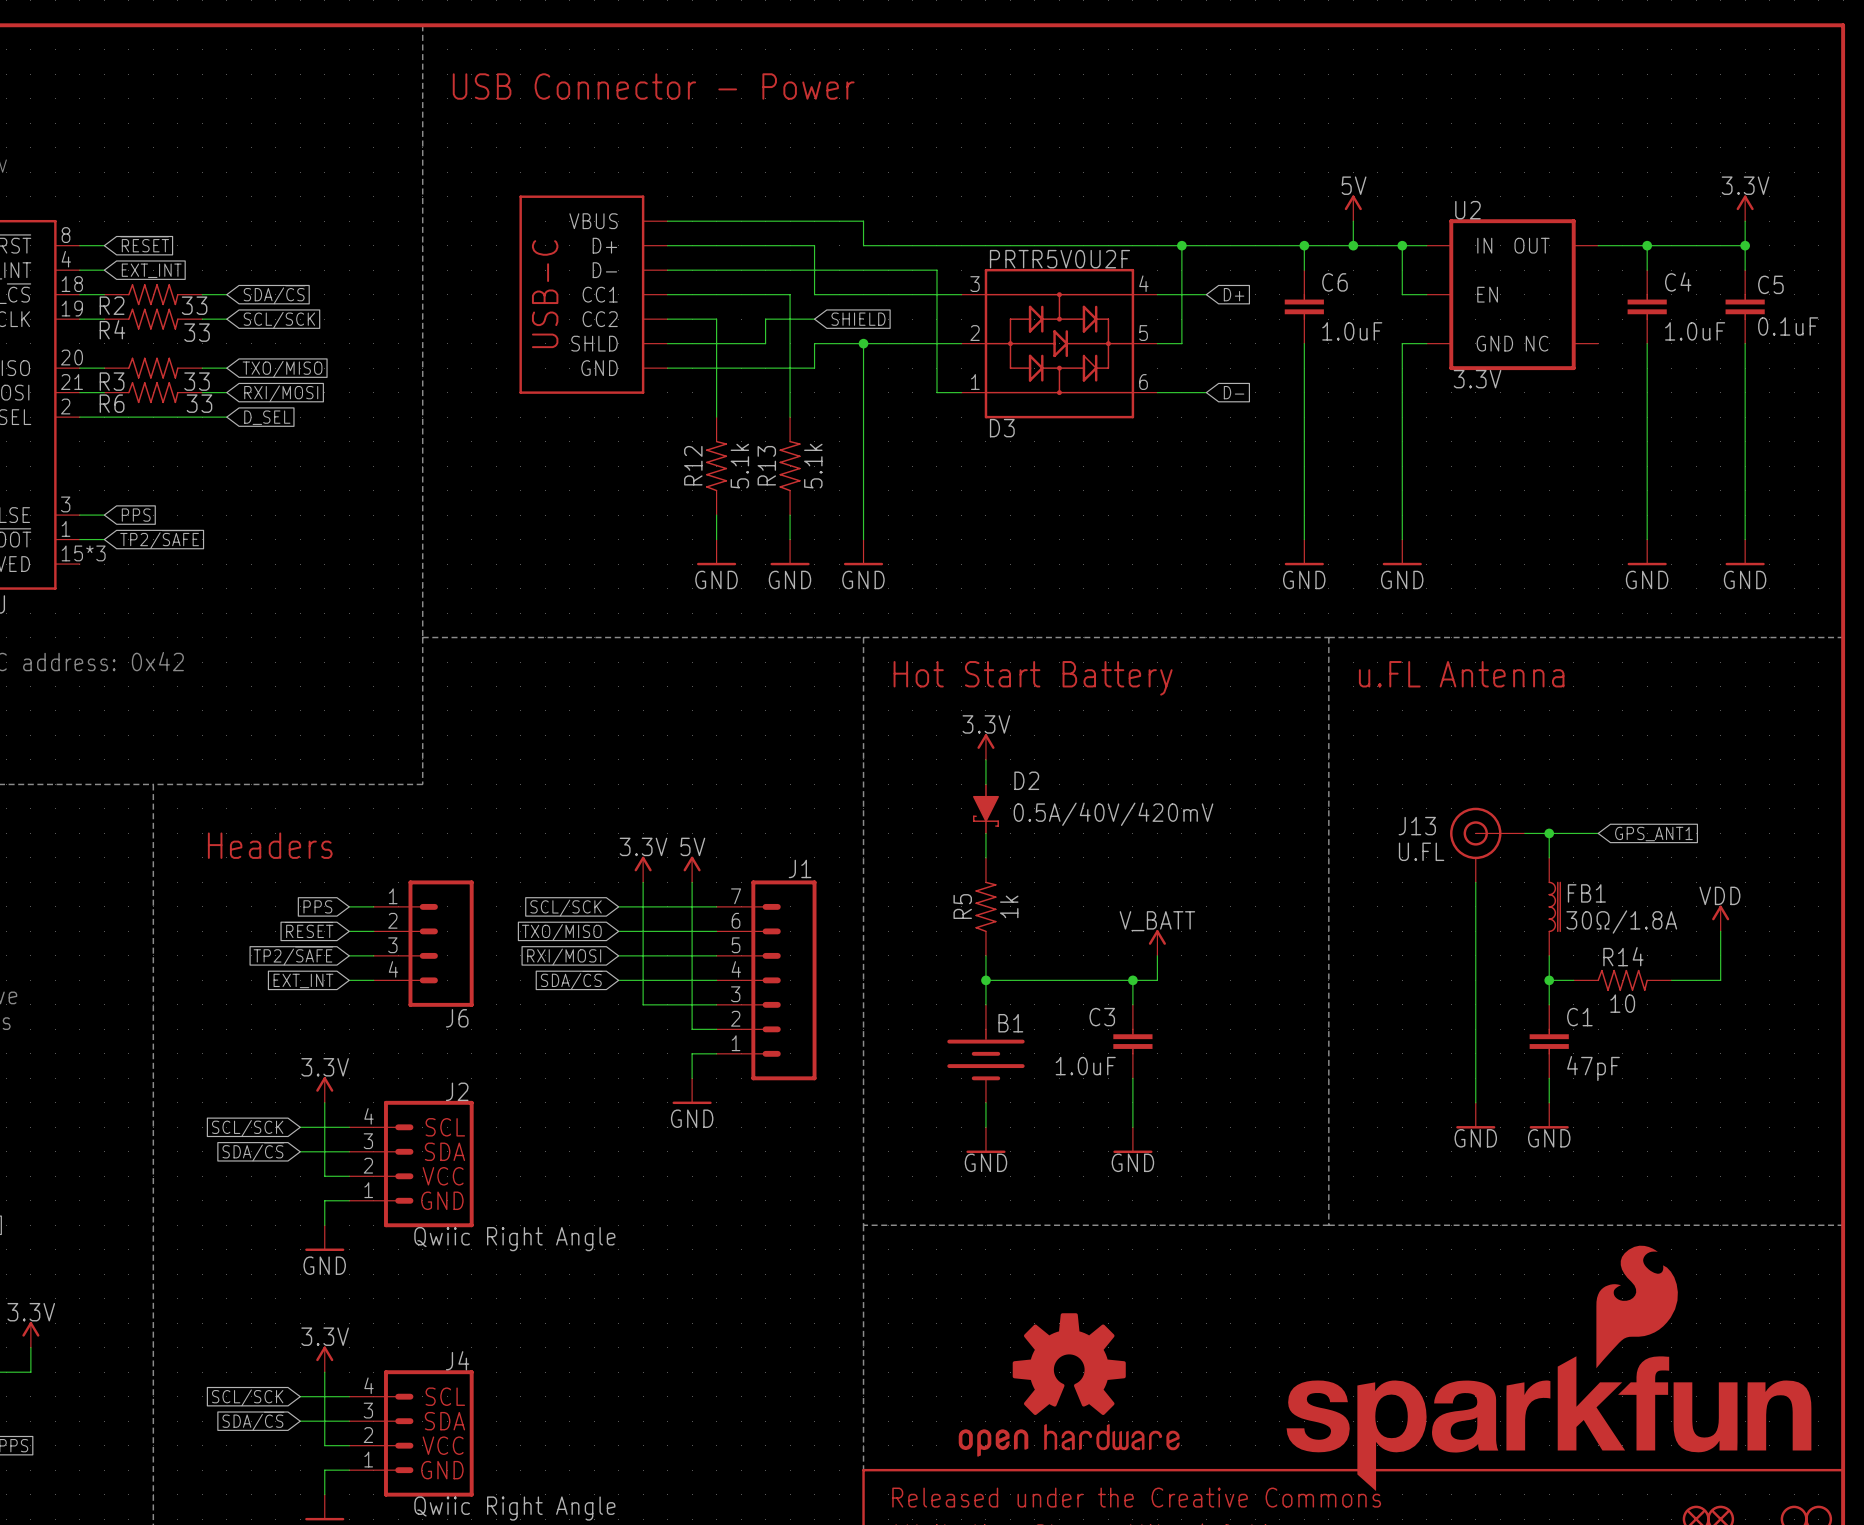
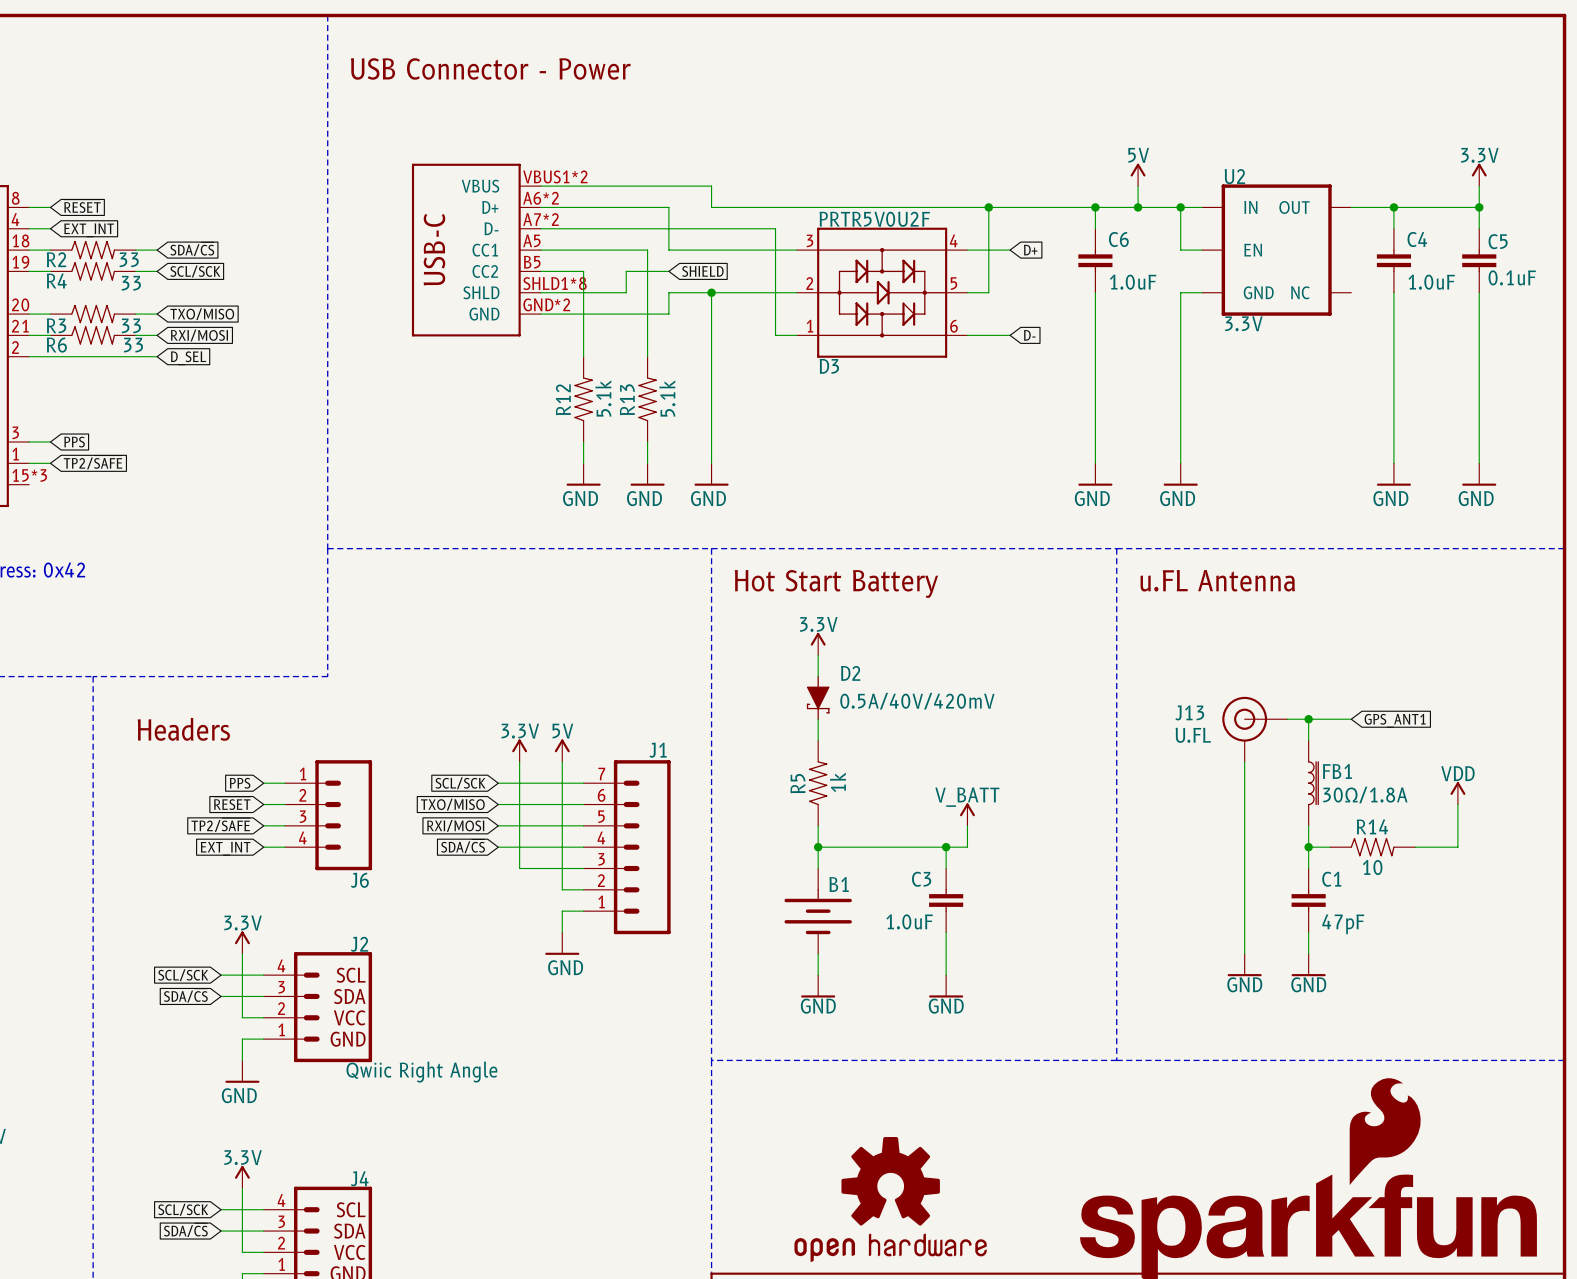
part pin number: none -> VBUS1*2 (555, 176)
part pin number: none -> A6*2 (540, 198)
part pin number: none -> A7*2 (540, 219)
part pin number: none -> A5 (531, 240)
part pin number: none -> B5 (532, 262)
part pin number: none -> SHLD1*8 (554, 283)
part pin number: none -> GND*2 (546, 304)

